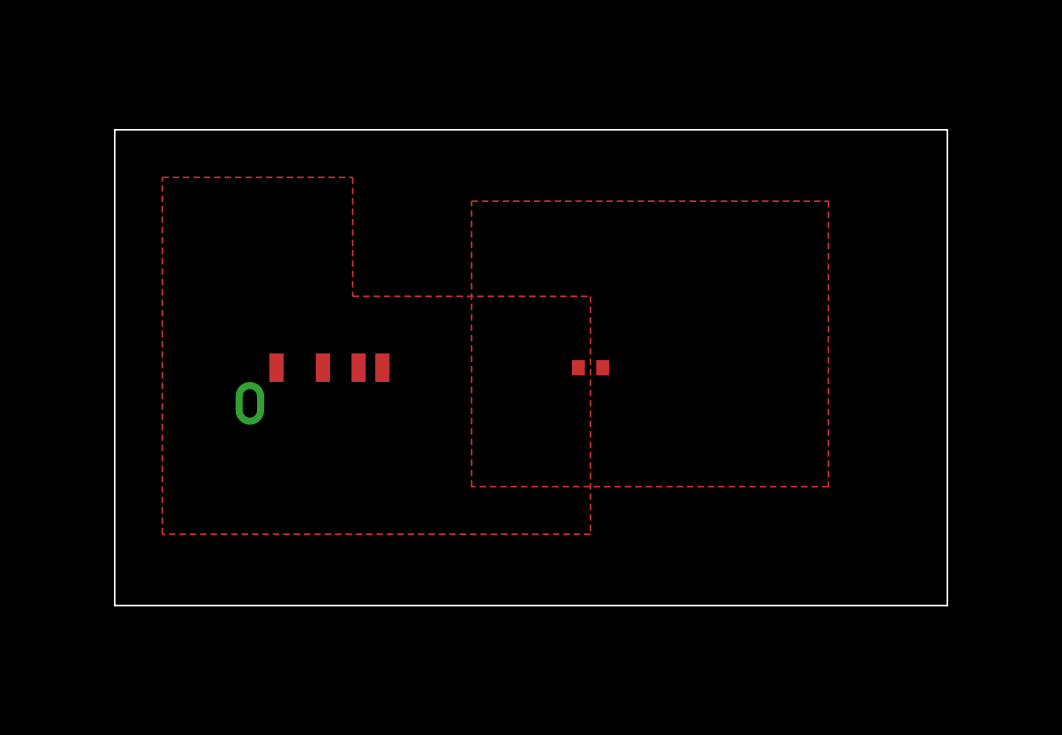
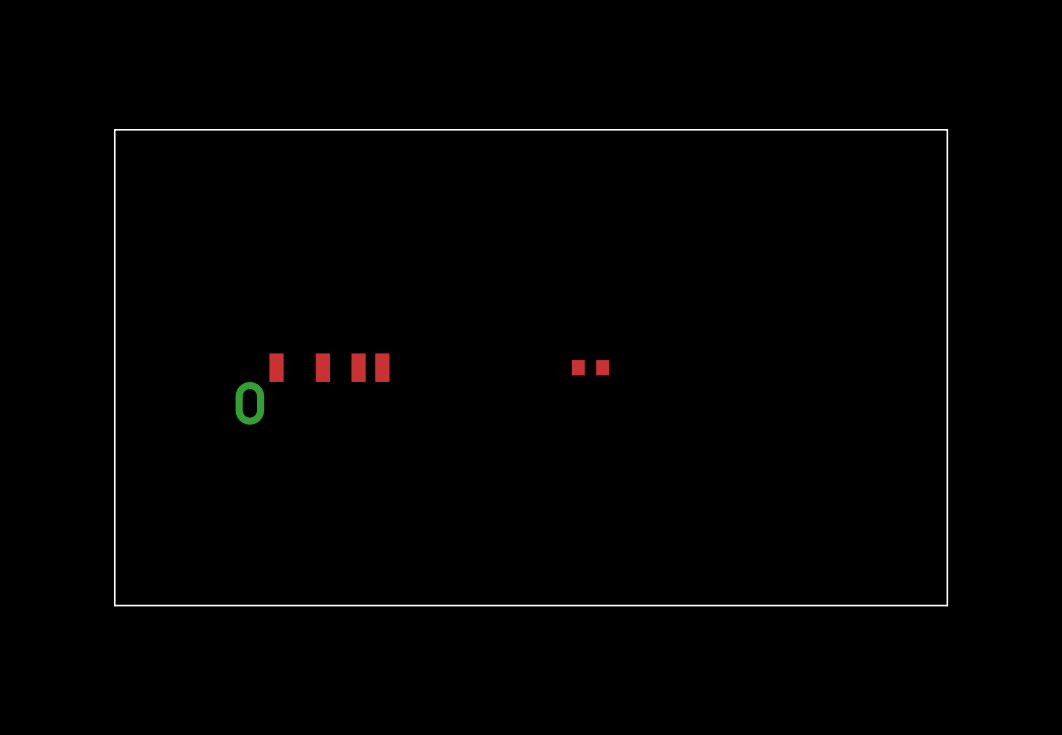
zone outline: (162, 177) (352, 177) (352, 296) (590, 296) (590, 534) (162, 534) (162, 177) -> none
zone outline: (471, 201) (828, 201) (828, 486) (471, 486) (471, 201) -> none

